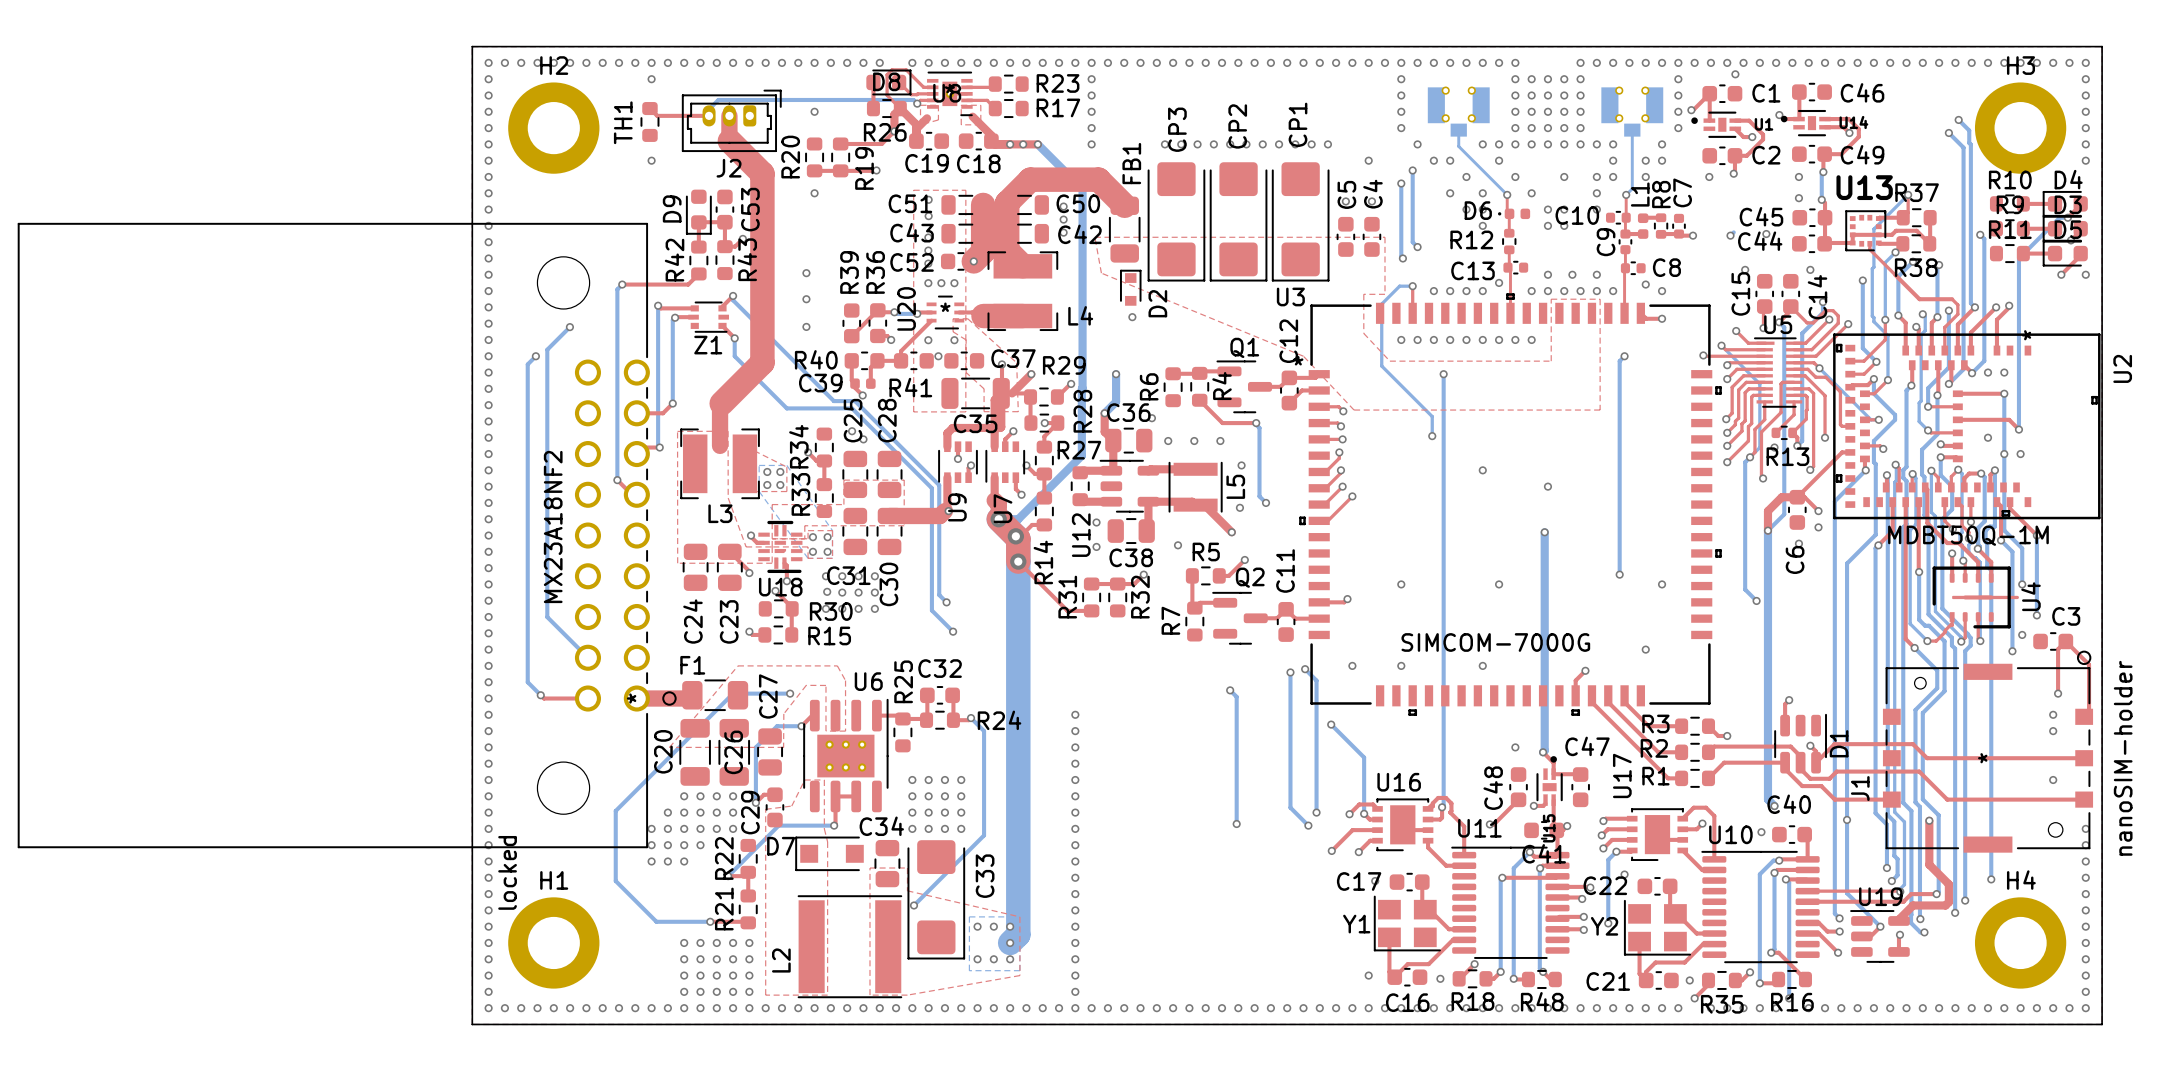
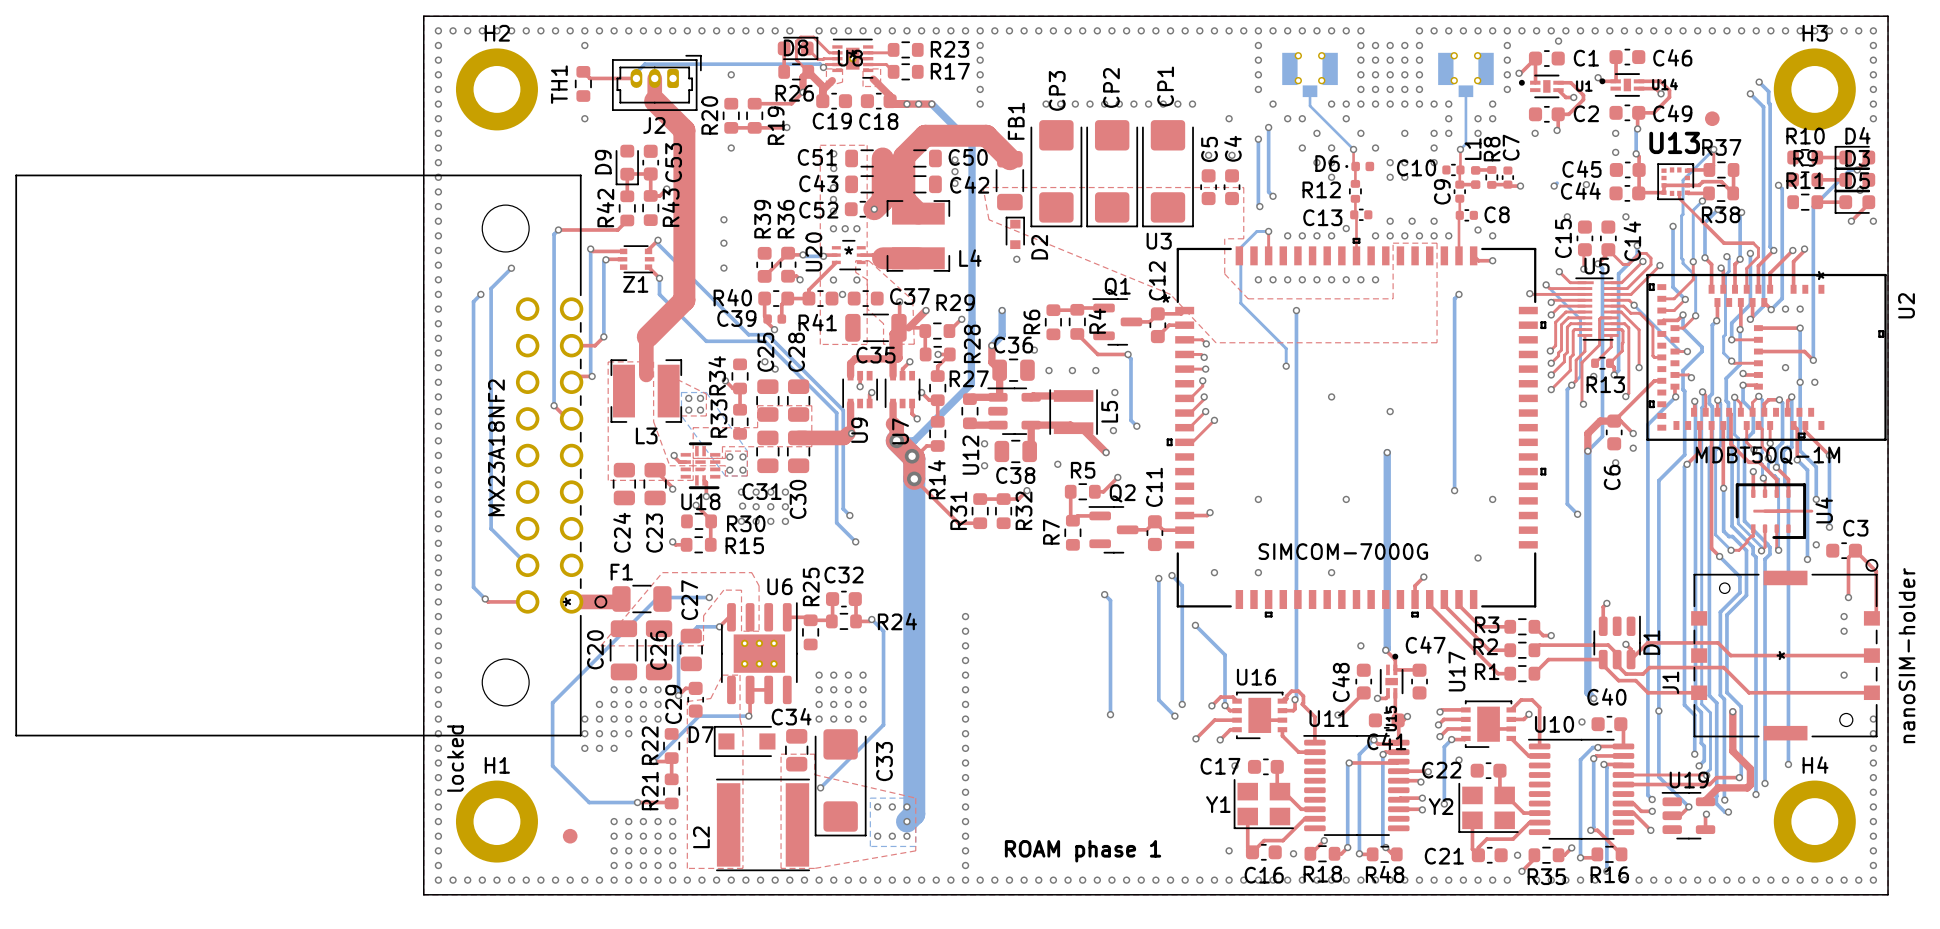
part: none -> (1712, 118)
part: none -> (570, 836)
text: none -> ROAM phase 1 (1083, 851)

